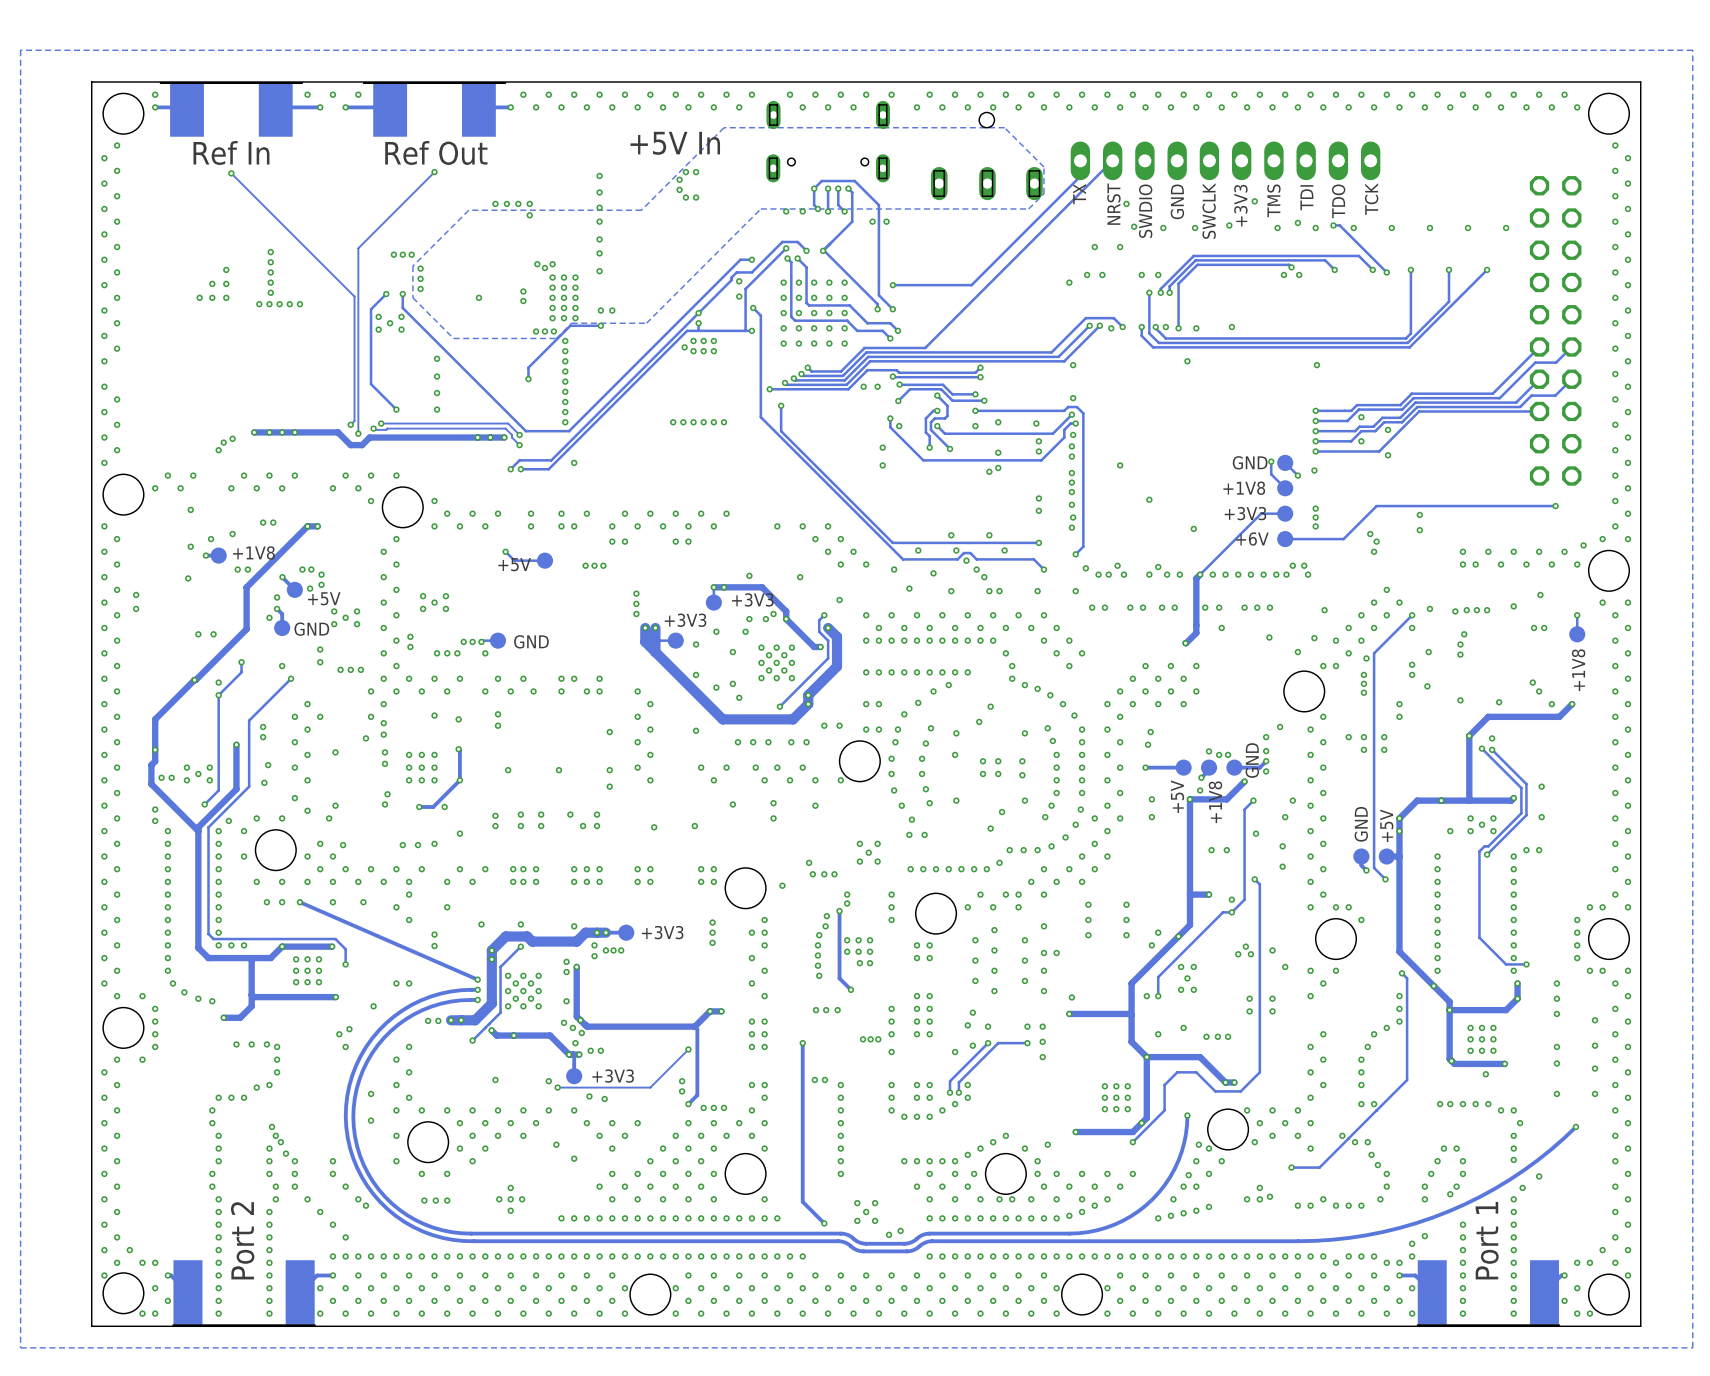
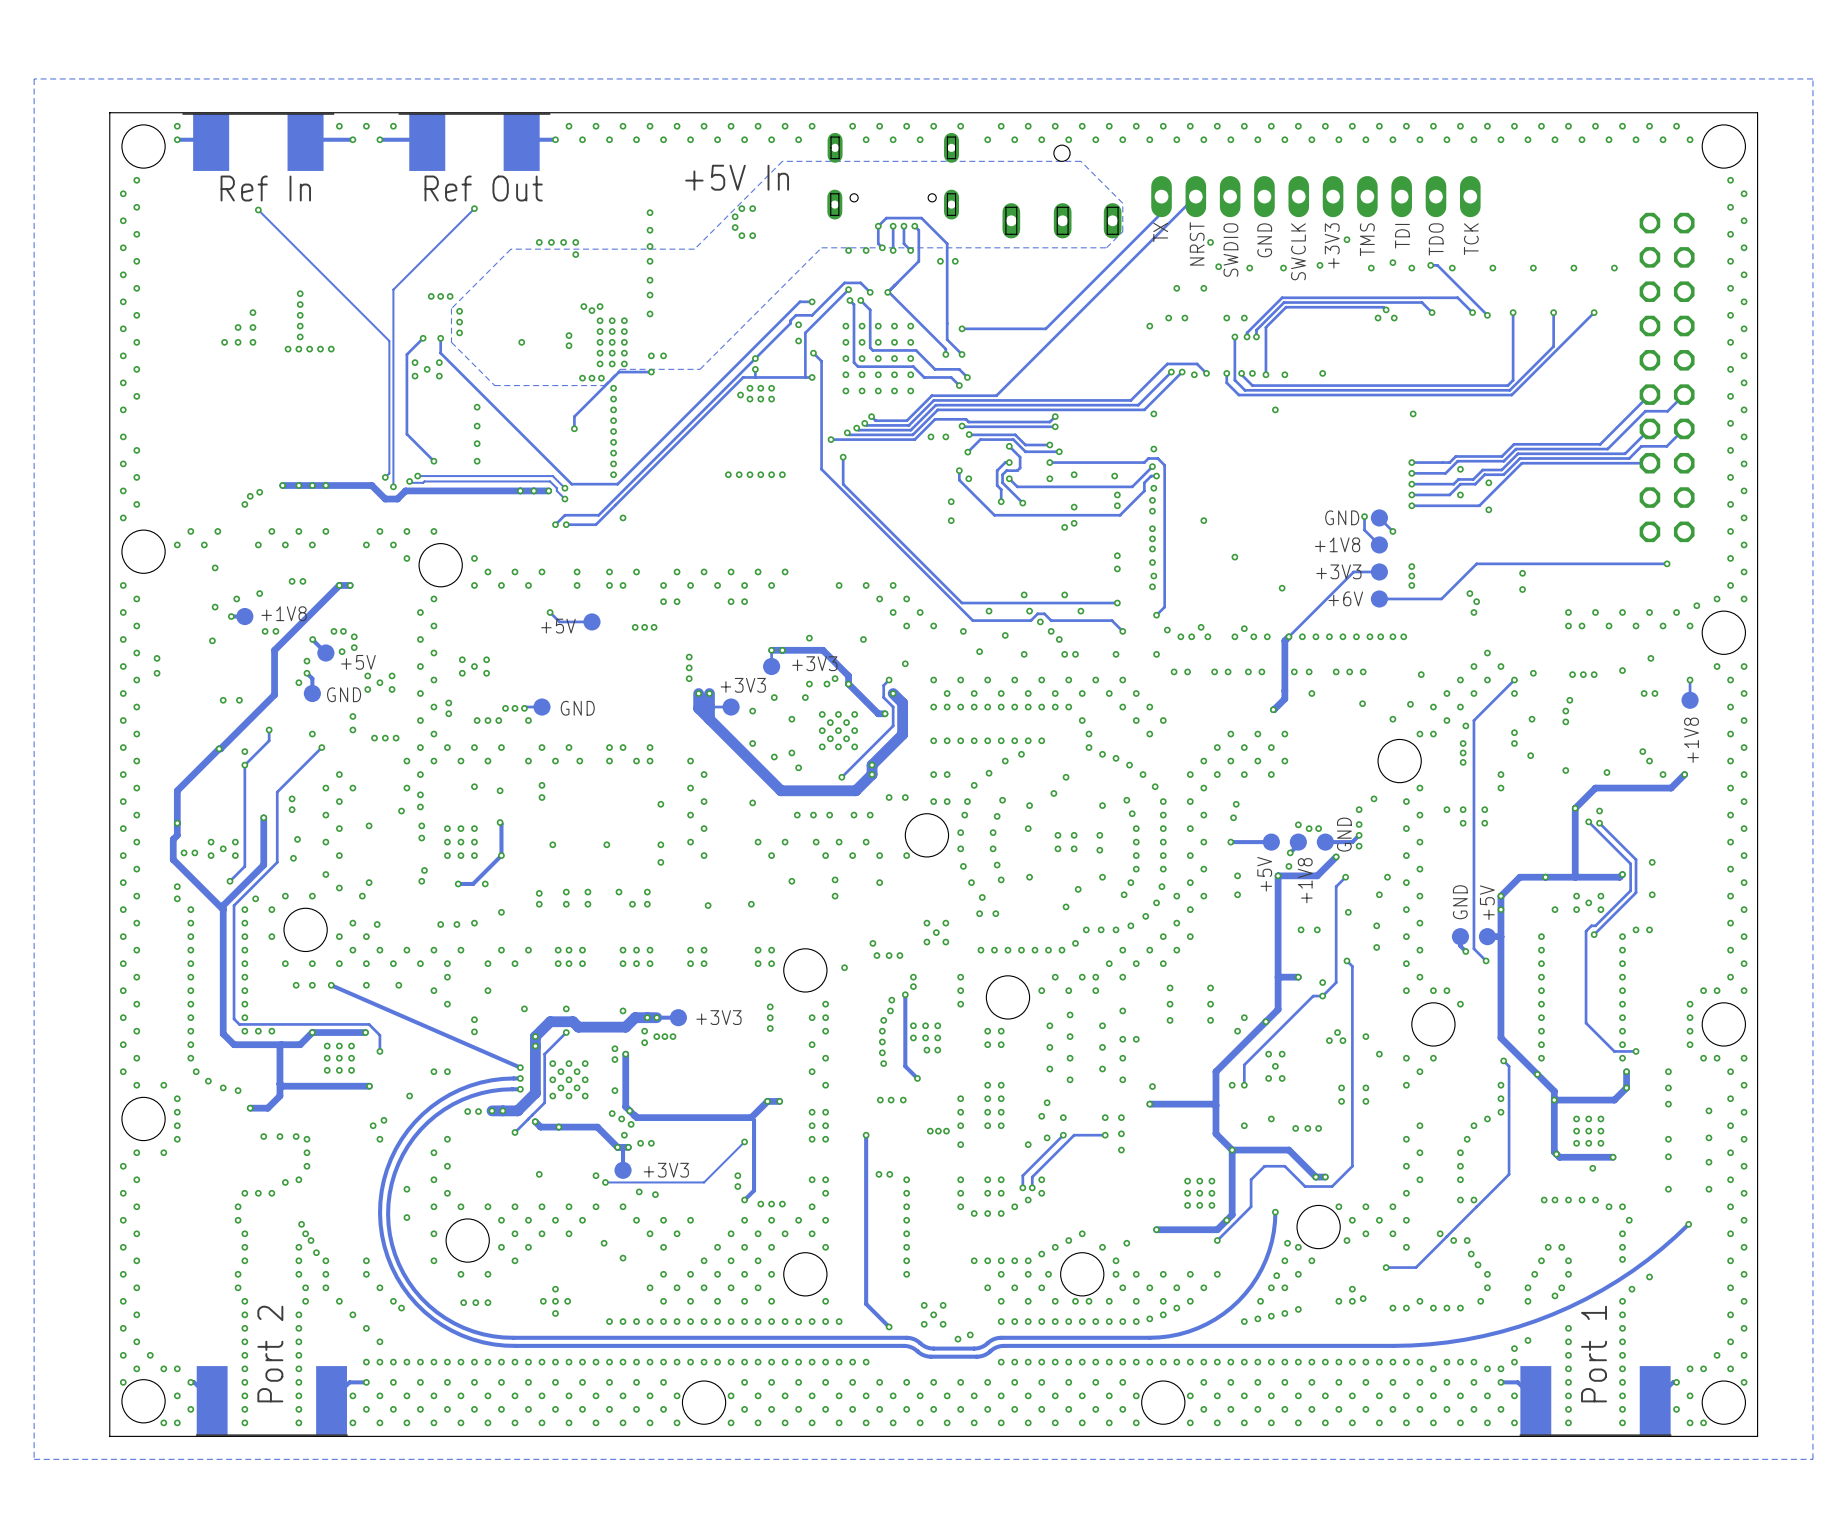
via: (1314, 470) -> none
via: (1292, 565) -> none
via: (1304, 565) -> none
via: none -> (1392, 636)
via: (1455, 611) -> none

